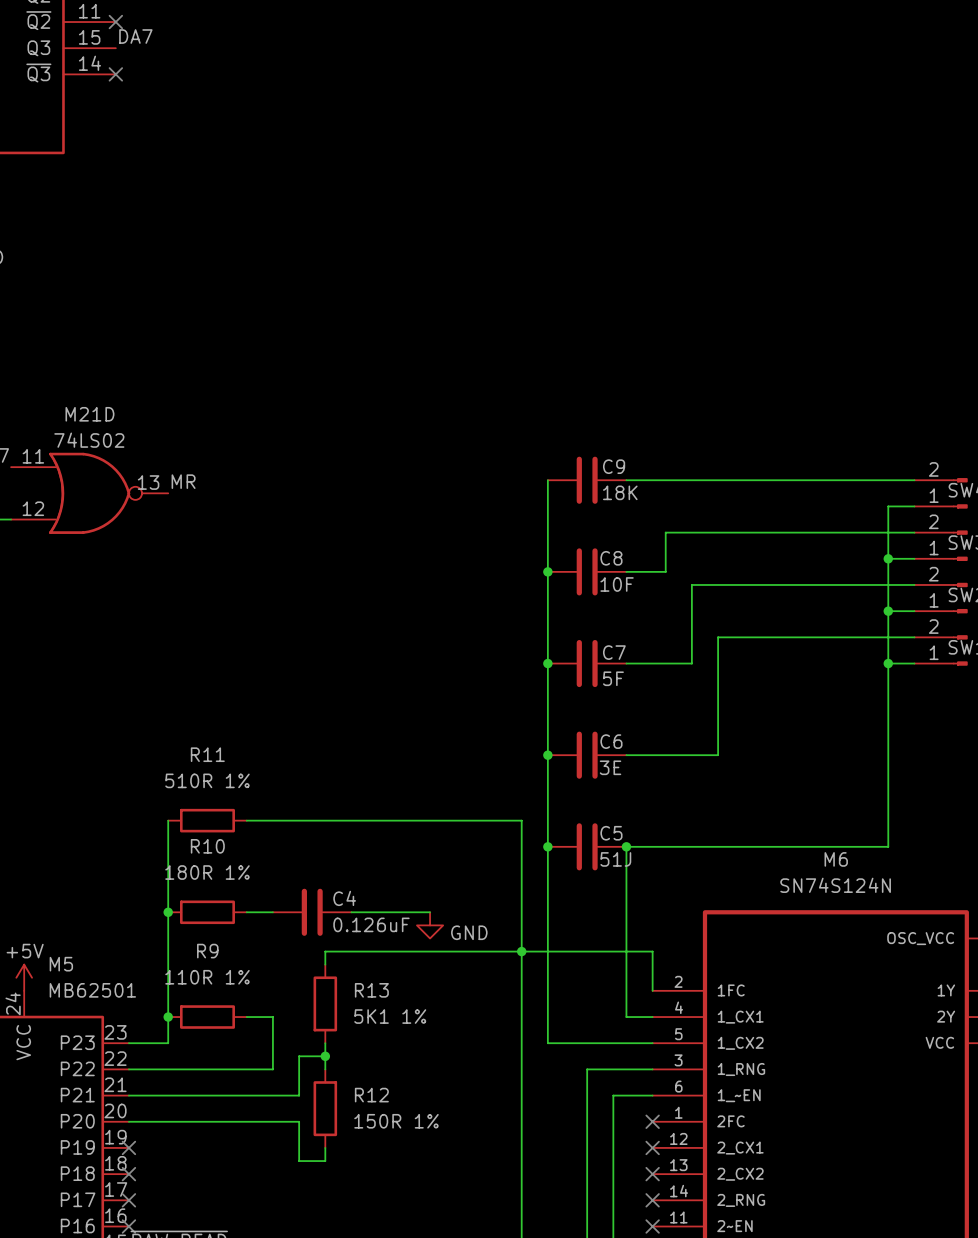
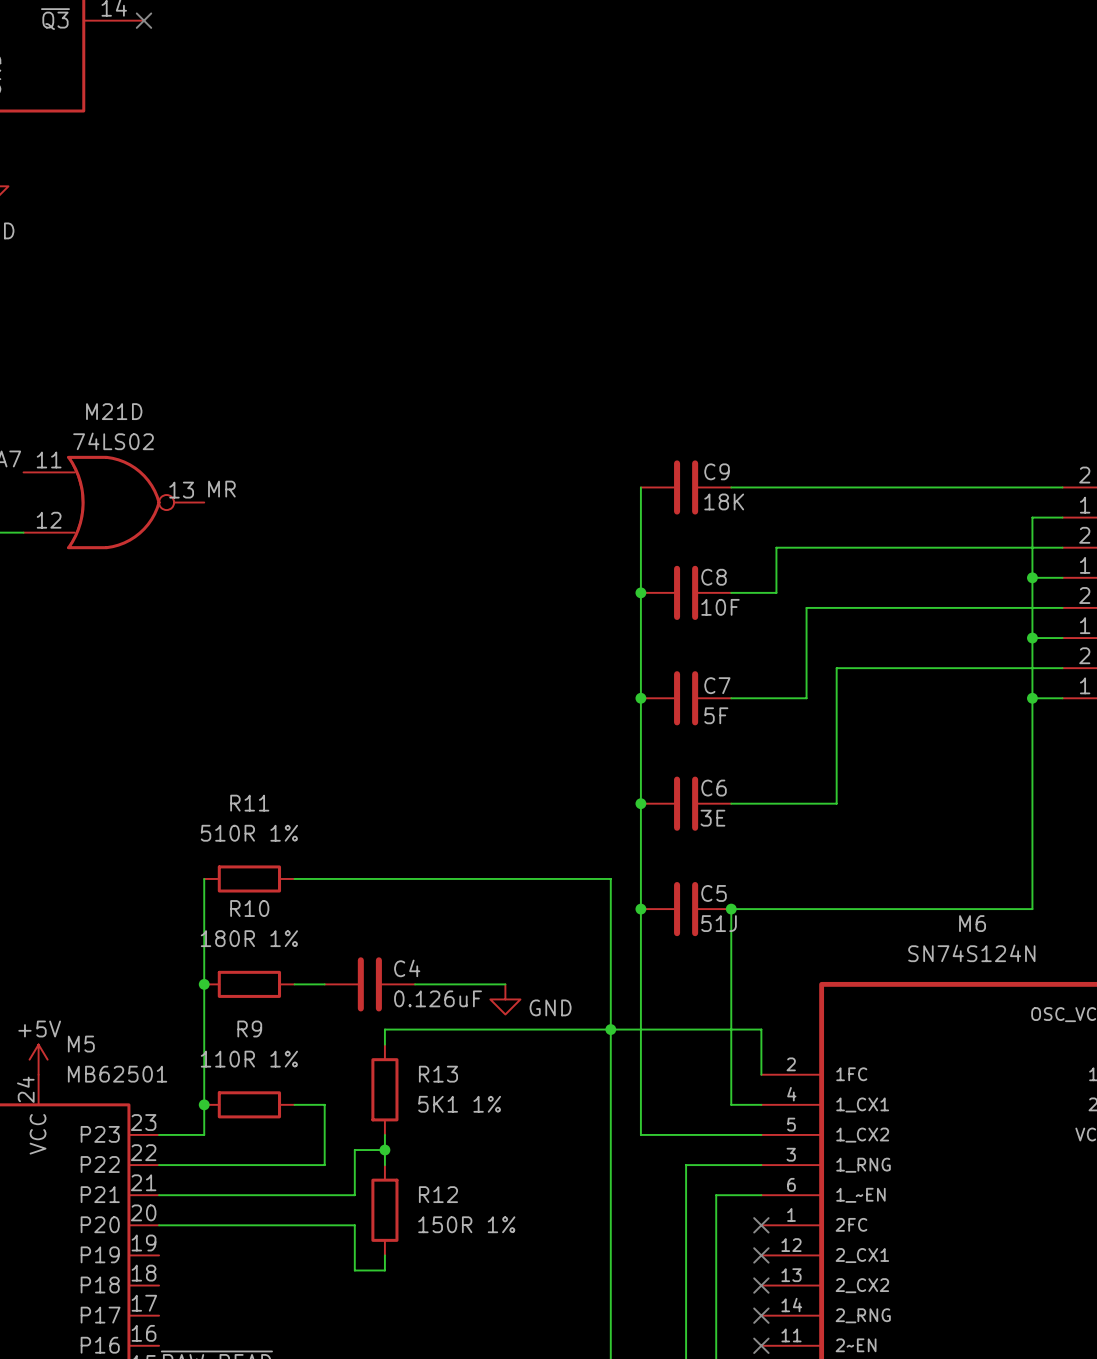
no-connect mark: (128, 1147) -> none
no-connect mark: (128, 1174) -> none
no-connect mark: (128, 1200) -> none
no-connect mark: (128, 1226) -> none

